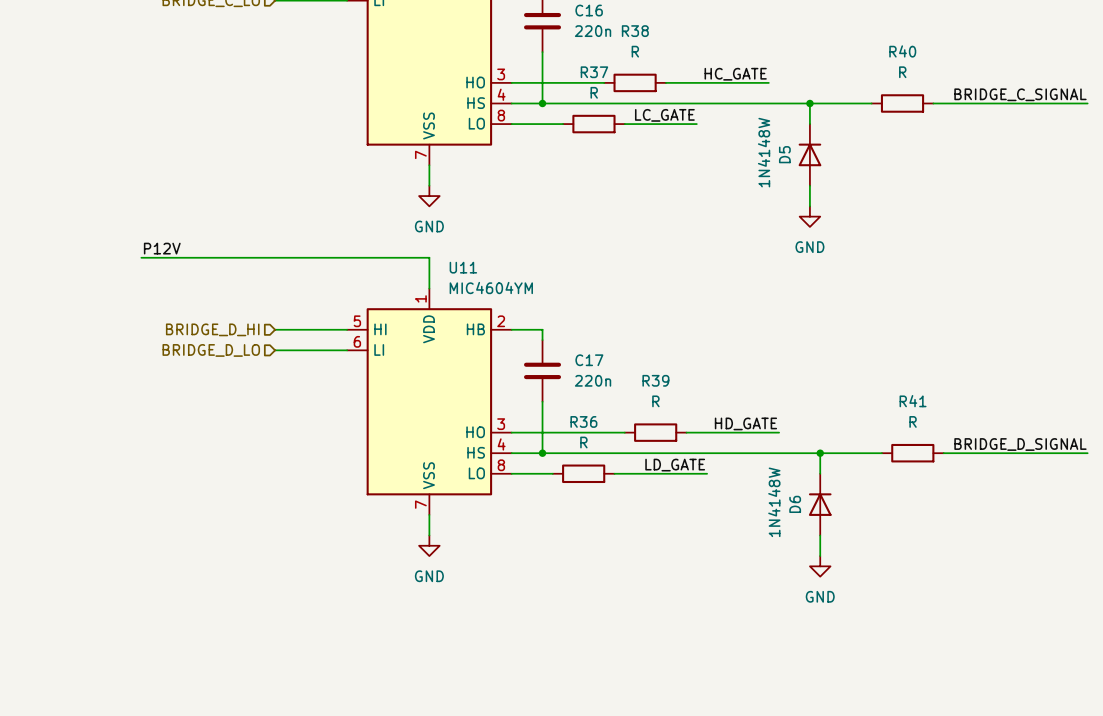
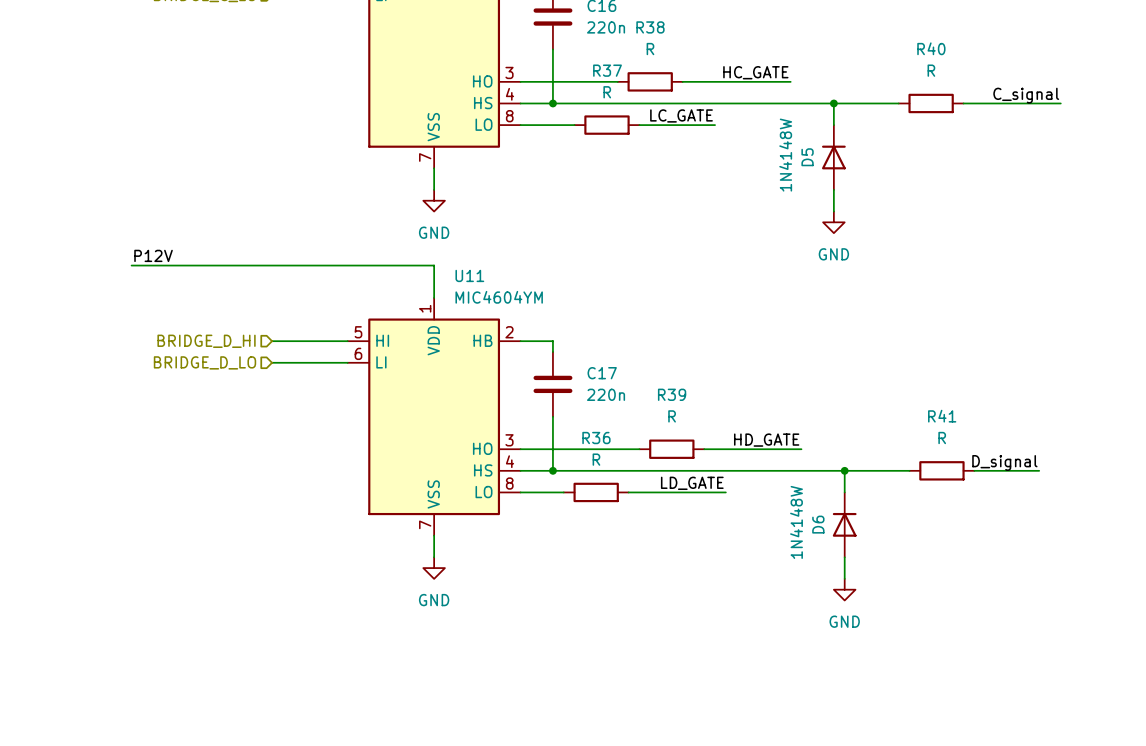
label: BRIDGE_C_SIGNAL (1020, 94) -> none
label: none -> C_signal (1026, 95)
wire: (1025, 103) (1087, 103) -> none
label: BRIDGE_D_SIGNAL (1020, 444) -> none
label: none -> D_signal (1004, 462)
wire: (1005, 453) (1087, 453) -> none

